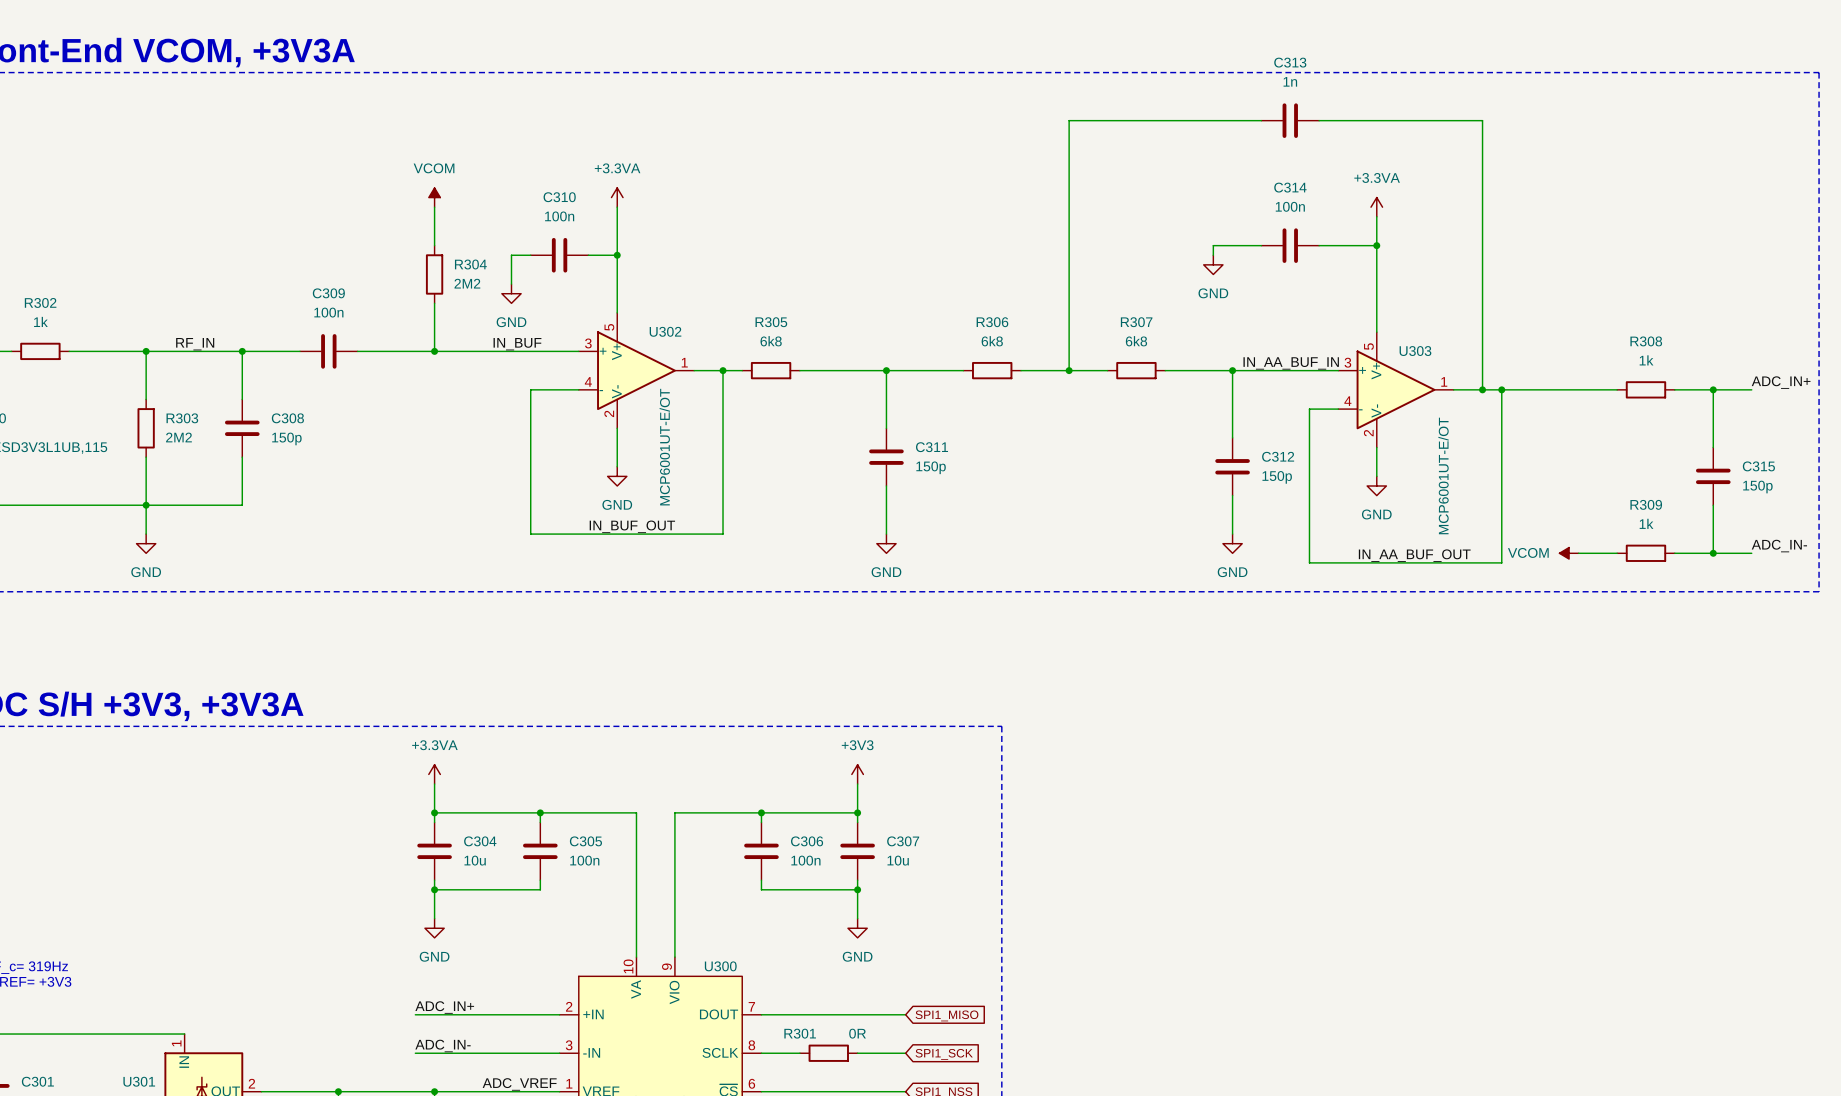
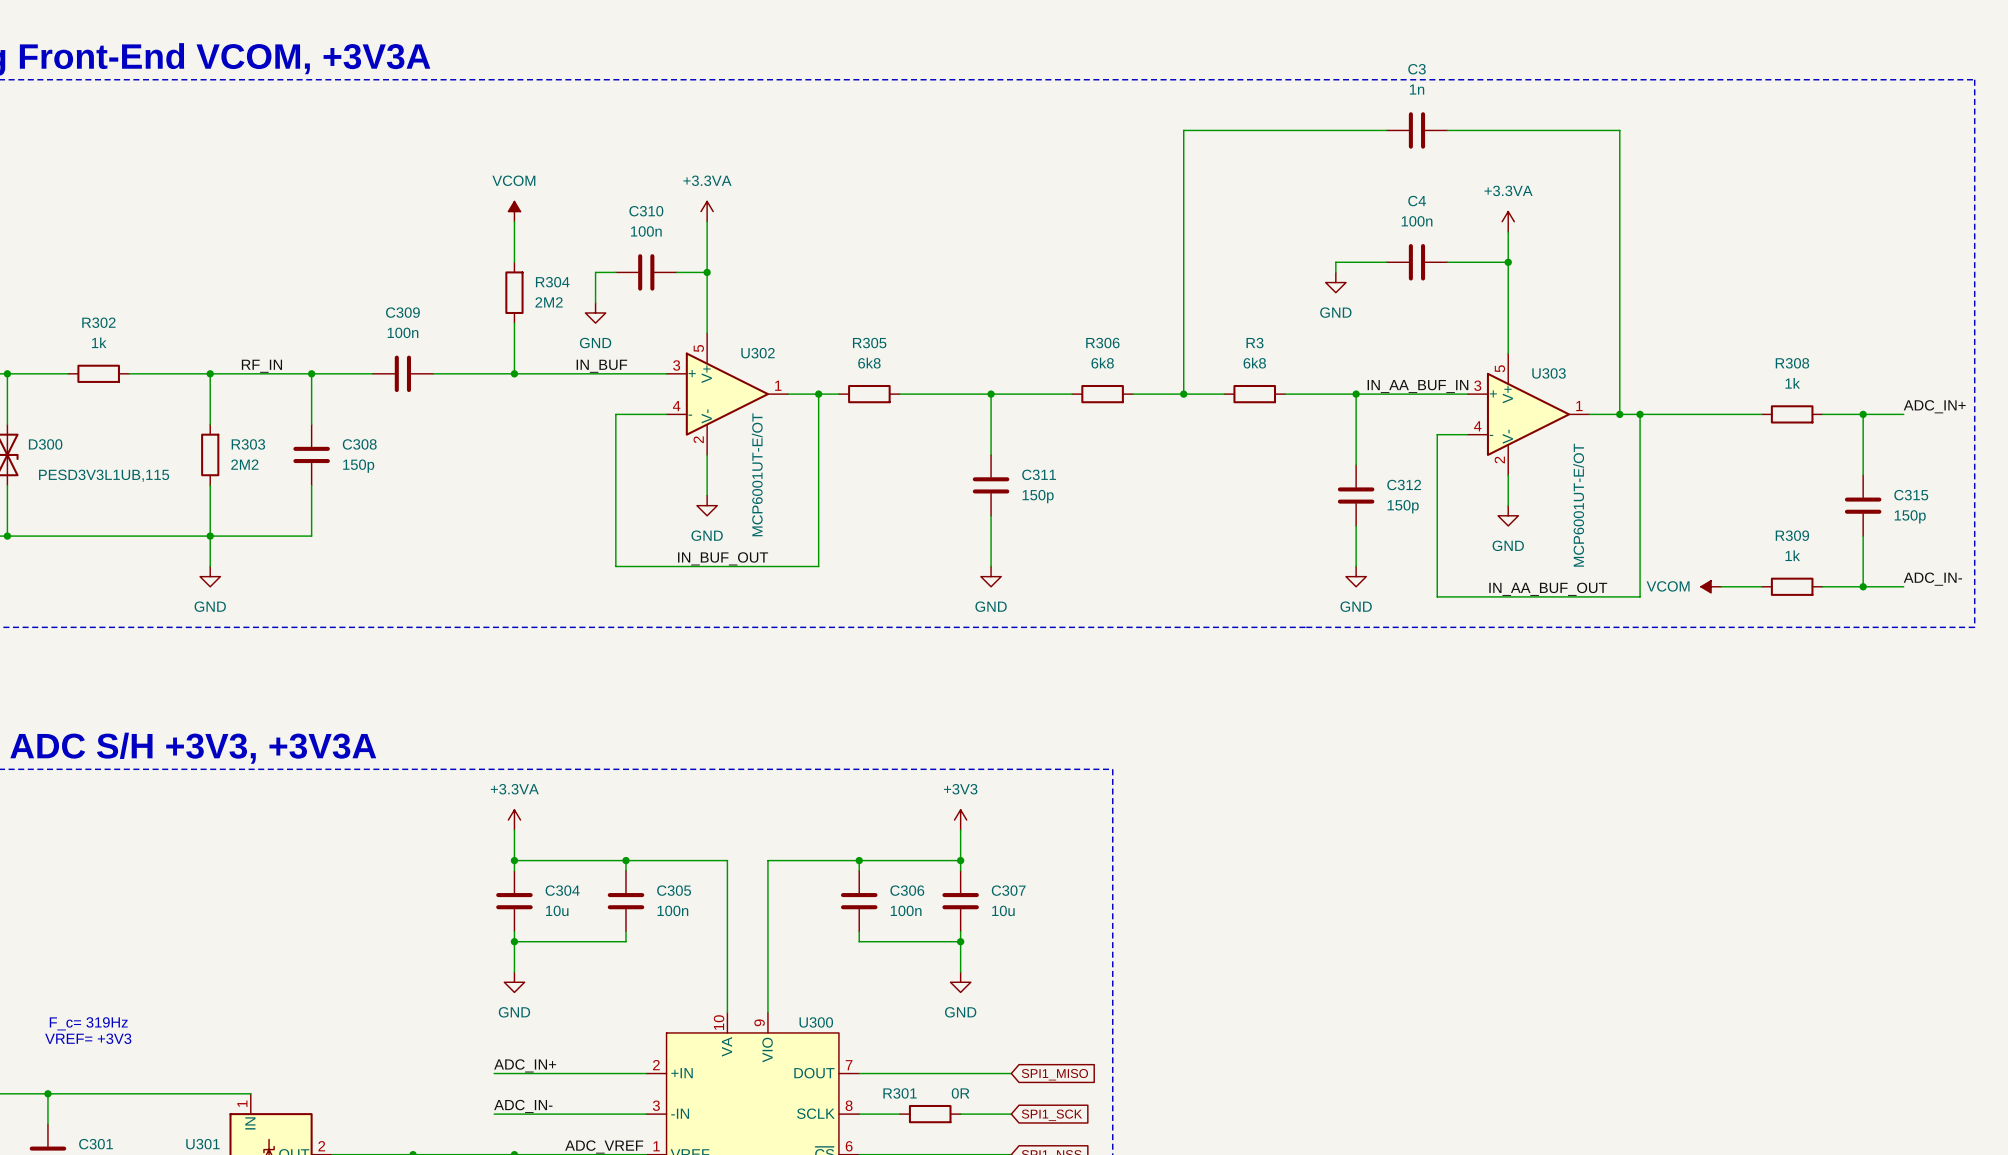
C313 name: C313 (1290, 62) -> C3 (1417, 69)
C314 name: C314 (1290, 187) -> C4 (1417, 201)
R307 name: R307 (1136, 322) -> R3 (1254, 343)

